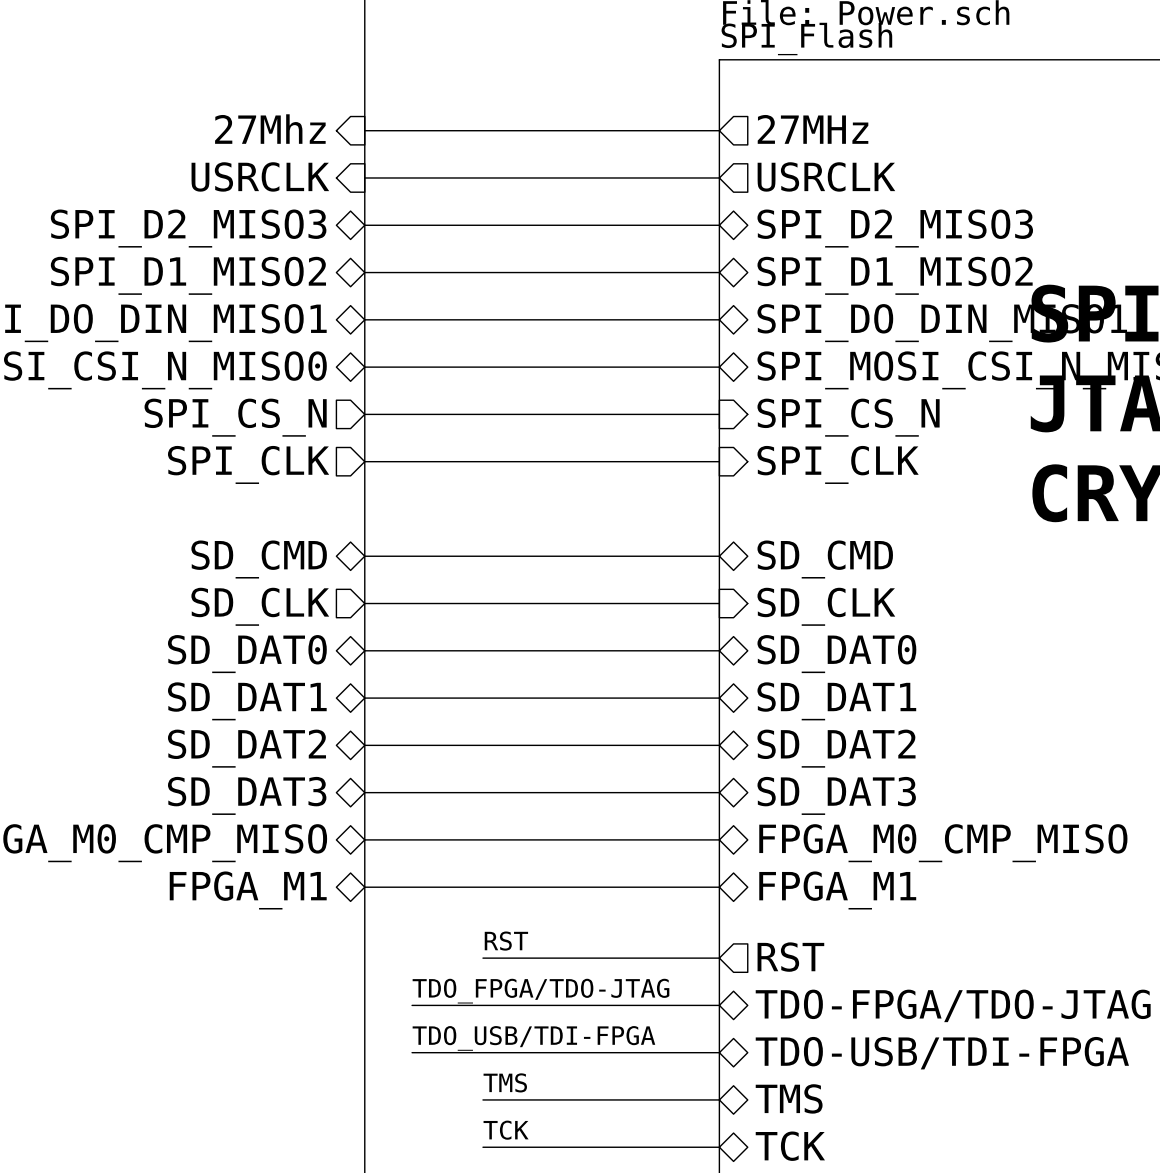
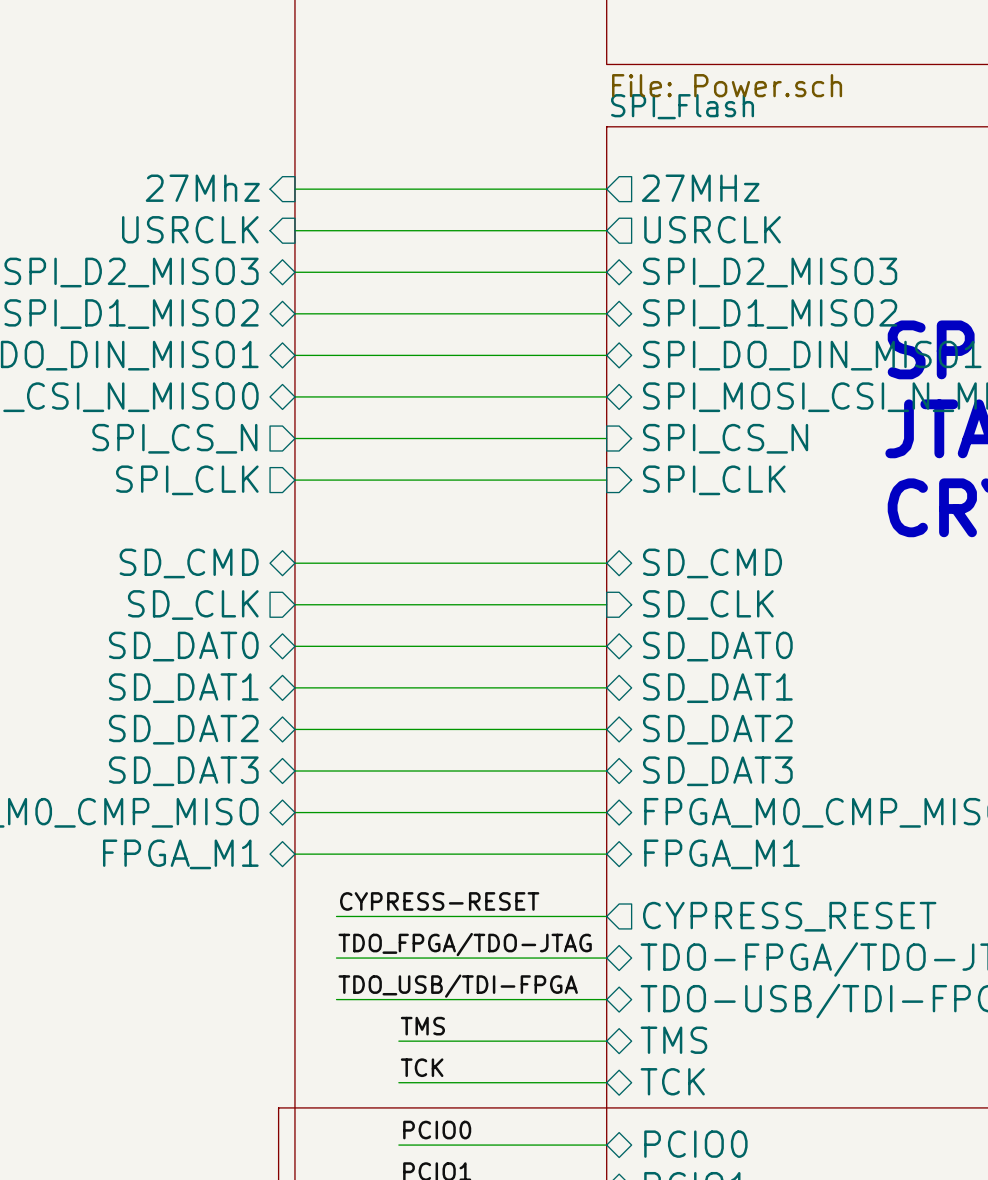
label: RST (506, 941) -> none
label: none -> CYPRESS-RESET (439, 901)
sheet pin: RST (790, 957) -> CYPRESS_RESET (789, 916)
wire: none -> (336, 916) (398, 916)

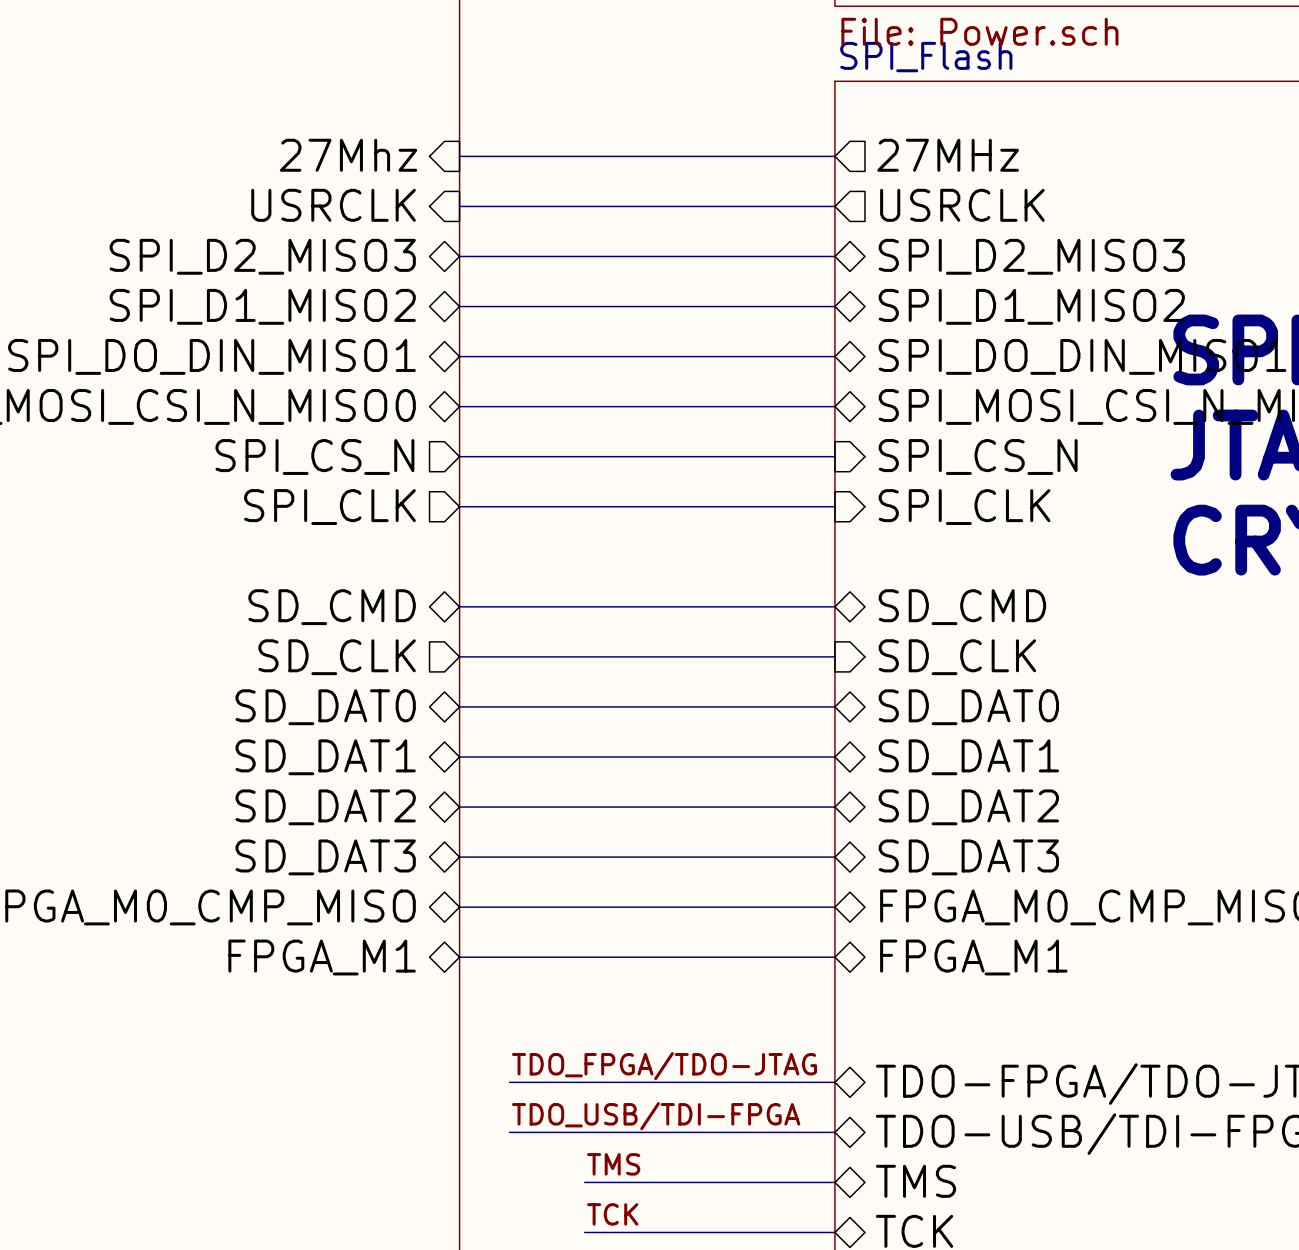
label: CYPRESS-RESET (439, 901) -> none
wire: (336, 916) (606, 916) -> none
sheet pin: CYPRESS_RESET (789, 916) -> none

